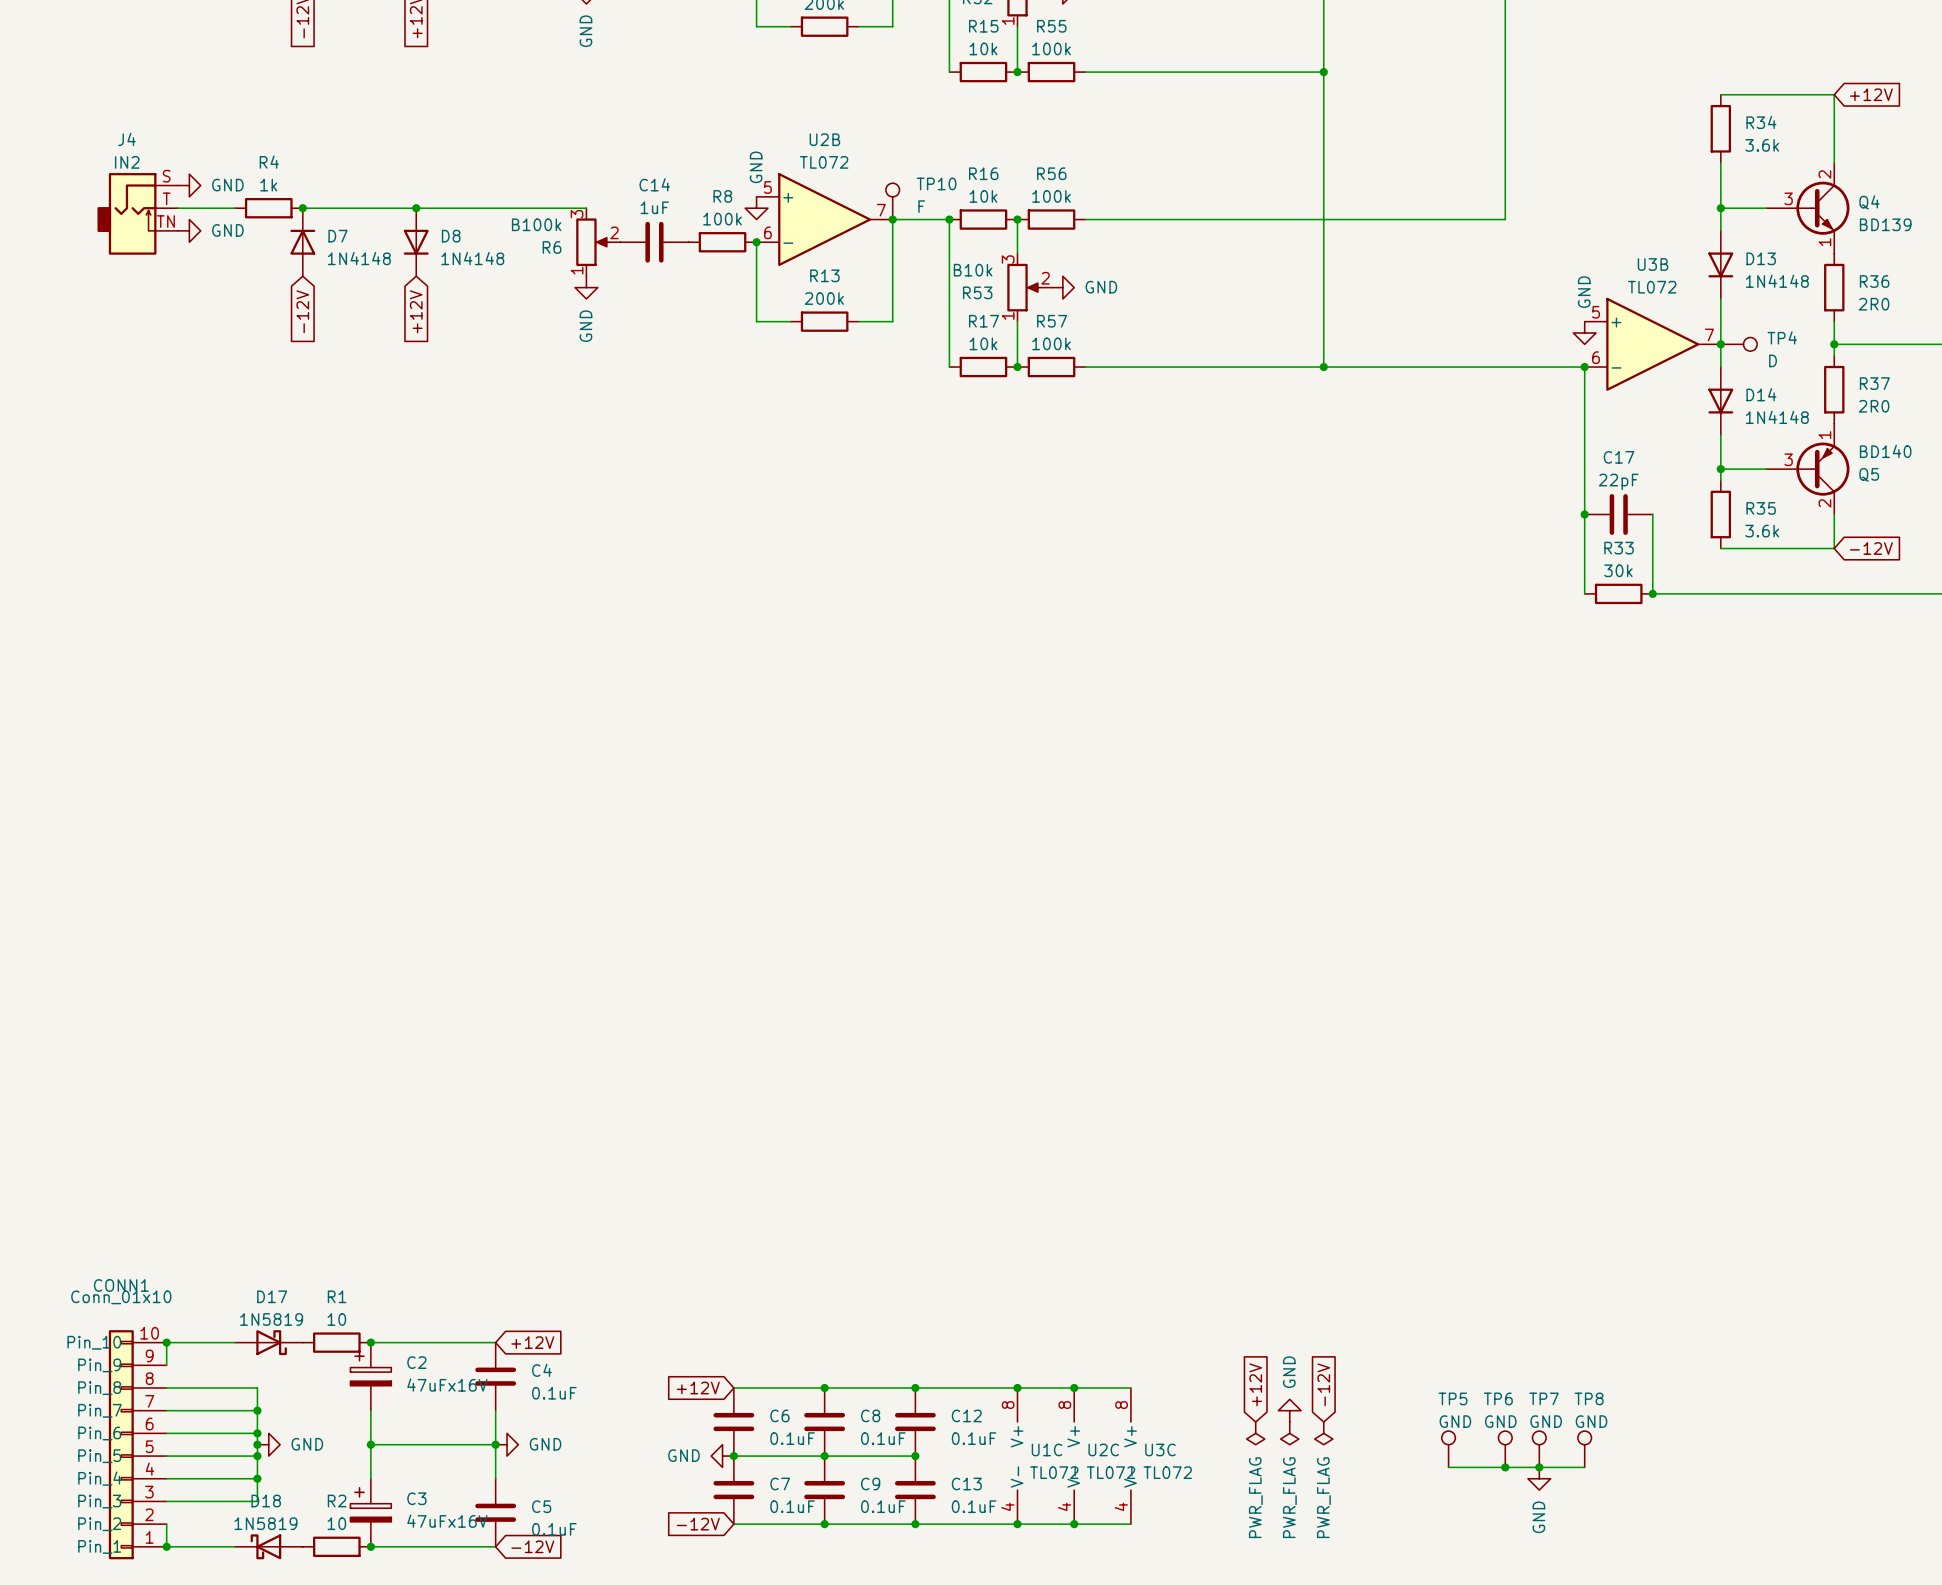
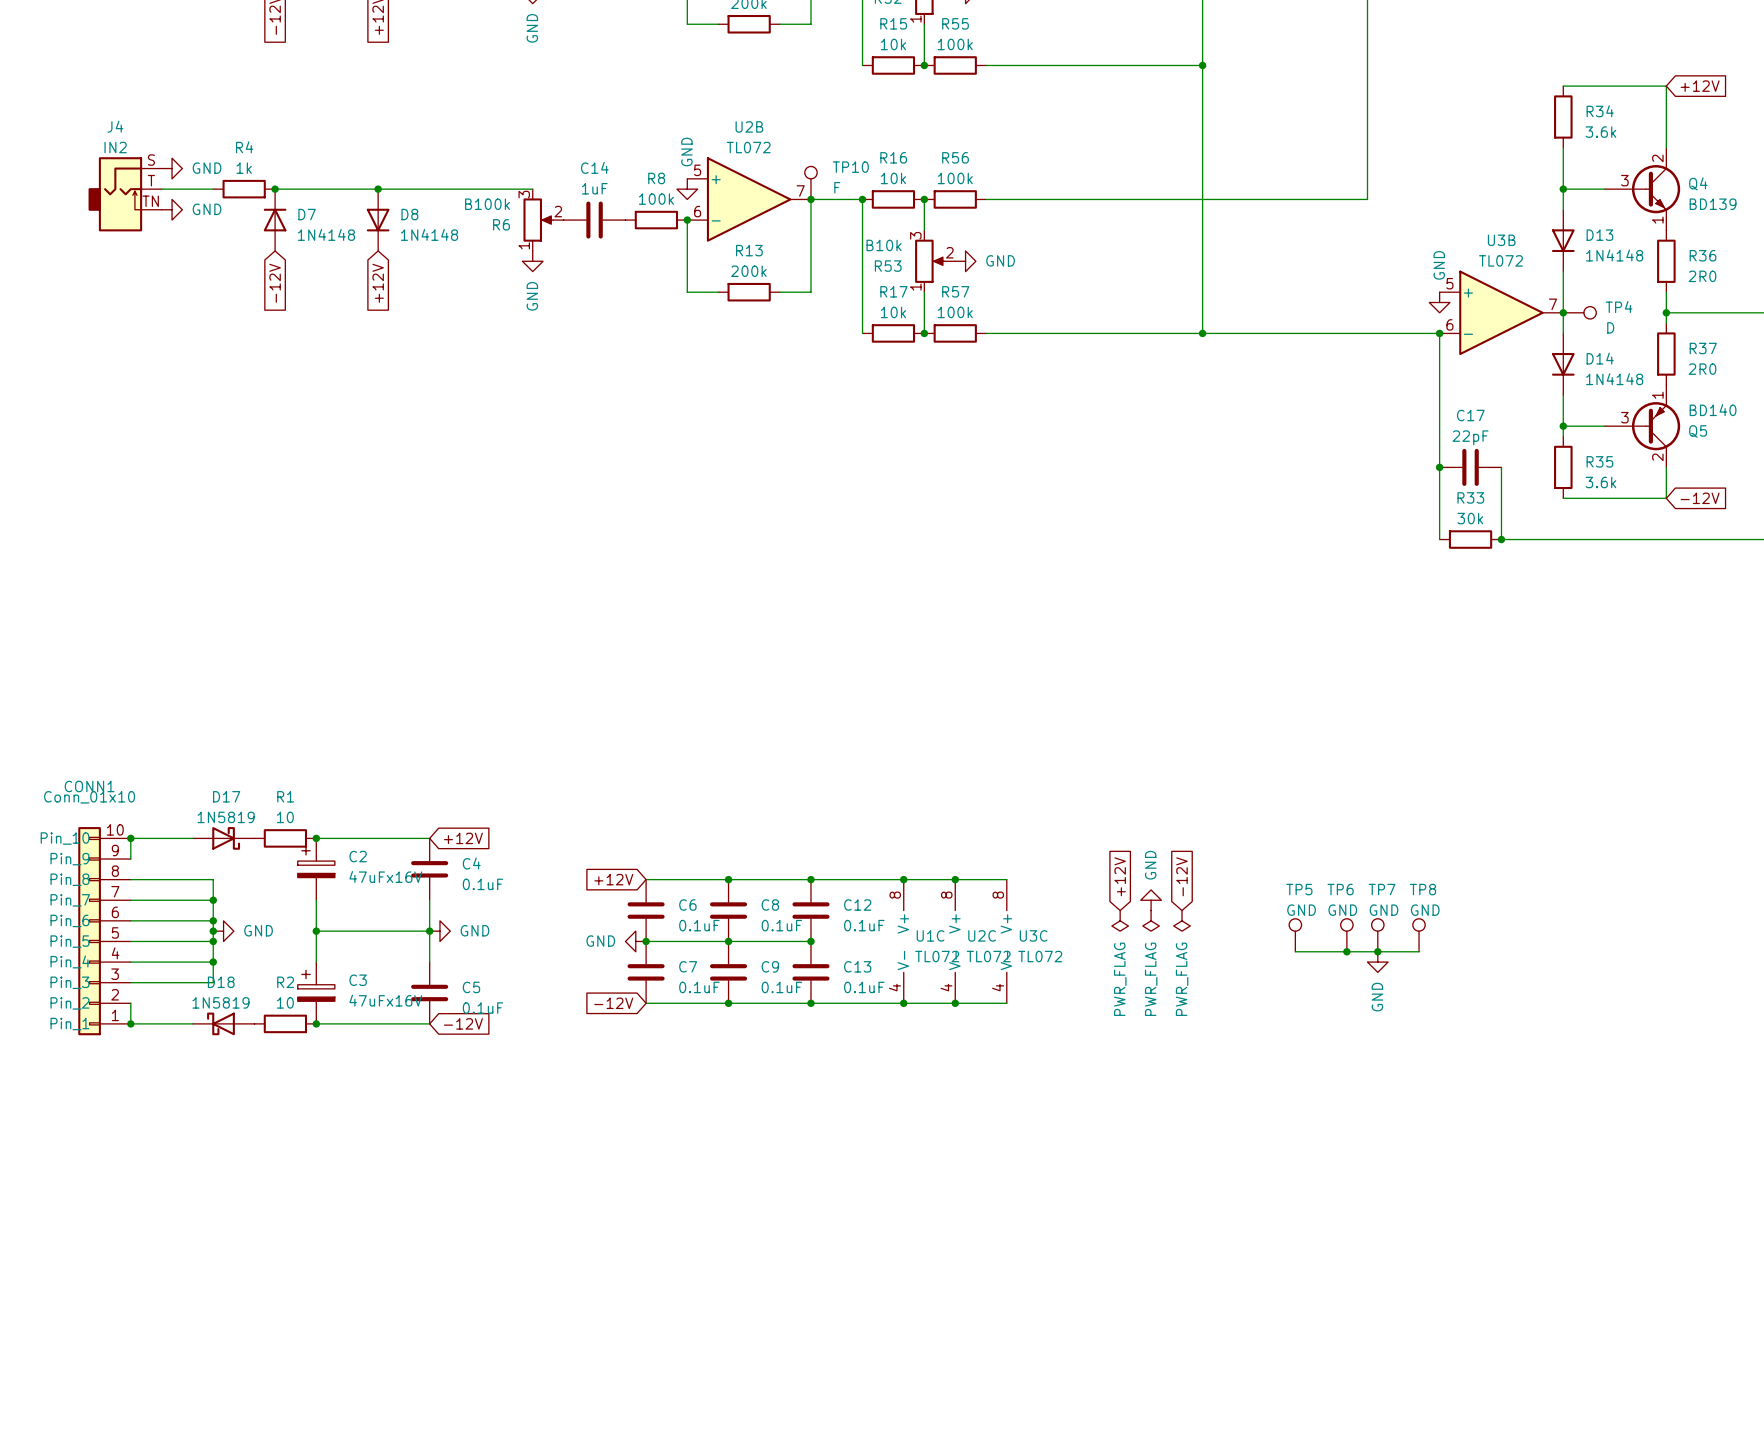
junction: none -> (130, 838)
wire: none -> (192, 838) (130, 838) (130, 859)
wire: none -> (316, 838) (429, 838)
junction: none -> (316, 838)
global label: none -> +12V (463, 838)
global label: none -> +12V (1120, 876)
global label: none -> -12V (1181, 876)
wire: none -> (130, 879) (213, 879) (213, 982) (130, 982)
global label: none -> +12V (613, 879)
wire: none -> (646, 879) (1006, 879)
junction: none -> (728, 879)
junction: none -> (810, 879)
junction: none -> (903, 879)
junction: none -> (955, 879)
wire: none -> (130, 900) (213, 900)
junction: none -> (213, 900)
wire: none -> (316, 900) (316, 962)
wire: none -> (429, 900) (429, 962)
power symbol: none -> GND (1151, 900)
wire: none -> (130, 920) (213, 920)
junction: none -> (213, 920)
power symbol: none -> PWR_FLAG (1120, 920)
power symbol: none -> PWR_FLAG (1151, 920)
power symbol: none -> PWR_FLAG (1181, 920)
junction: none -> (213, 931)
power symbol: none -> GND (223, 931)
wire: none -> (316, 931) (429, 931)
junction: none -> (316, 931)
junction: none -> (429, 931)
power symbol: none -> GND (439, 931)
wire: none -> (130, 941) (213, 941)
junction: none -> (213, 941)
power symbol: none -> GND (635, 941)
wire: none -> (646, 941) (810, 941)
junction: none -> (646, 941)
junction: none -> (728, 941)
junction: none -> (810, 941)
wire: none -> (1295, 951) (1419, 951)
junction: none -> (1346, 951)
junction: none -> (1377, 951)
wire: none -> (130, 962) (213, 962)
junction: none -> (213, 962)
power symbol: none -> GND (1377, 962)
wire: none -> (130, 1003) (130, 1023) (192, 1023)
global label: none -> -12V (613, 1003)
wire: none -> (646, 1003) (1006, 1003)
junction: none -> (728, 1003)
junction: none -> (810, 1003)
junction: none -> (903, 1003)
junction: none -> (955, 1003)
junction: none -> (130, 1023)
junction: none -> (316, 1023)
global label: none -> -12V (463, 1023)
junction: (166, 1342) -> none
wire: (234, 1342) (166, 1342) (166, 1365) -> none
D17 position: (268, 1342) -> (223, 838)
R1 position: (336, 1342) -> (285, 838)
wire: (370, 1342) (495, 1342) -> (316, 1023) (429, 1023)
junction: (370, 1342) -> none
global label: +12V (532, 1342) -> none
C2 position: (370, 1376) -> (316, 869)
C4 position: (495, 1376) -> (429, 869)
global label: +12V (1255, 1384) -> none
global label: -12V (1323, 1384) -> none
wire: (166, 1387) (257, 1387) (257, 1501) (166, 1501) -> none
global label: +12V (698, 1387) -> none
wire: (733, 1387) (1130, 1387) -> none
junction: (824, 1387) -> none
junction: (915, 1387) -> none
junction: (1017, 1387) -> none
junction: (1074, 1387) -> none
wire: (166, 1410) (257, 1410) -> none
junction: (257, 1410) -> none
wire: (370, 1410) (370, 1478) -> none
wire: (495, 1410) (495, 1478) -> none
power symbol: GND (1289, 1410) -> none
C6 position: (733, 1422) -> (646, 910)
C8 position: (824, 1422) -> (728, 910)
C12 position: (915, 1422) -> (810, 910)
wire: (166, 1433) (257, 1433) -> none
junction: (257, 1433) -> none
power symbol: PWR_FLAG (1255, 1433) -> none
power symbol: PWR_FLAG (1289, 1433) -> none
power symbol: PWR_FLAG (1323, 1433) -> none
CONN1 position: (137, 1444) -> (104, 931)
junction: (257, 1444) -> none
power symbol: GND (268, 1444) -> none
wire: (370, 1444) (495, 1444) -> none
junction: (370, 1444) -> none
junction: (495, 1444) -> none
power symbol: GND (507, 1444) -> none
TP5 position: (1448, 1449) -> (1295, 935)
TP6 position: (1505, 1449) -> (1346, 935)
TP7 position: (1539, 1449) -> (1377, 935)
TP8 position: (1584, 1449) -> (1419, 935)
wire: (166, 1456) (257, 1456) -> none
junction: (257, 1456) -> none
power symbol: GND (722, 1456) -> none
wire: (733, 1456) (915, 1456) -> none
junction: (733, 1456) -> none
junction: (824, 1456) -> none
junction: (915, 1456) -> none
U1C position: (1017, 1456) -> (903, 941)
U2C position: (1074, 1456) -> (955, 941)
U3C position: (1130, 1456) -> (1006, 941)
wire: (1448, 1467) (1584, 1467) -> none
junction: (1505, 1467) -> none
junction: (1539, 1467) -> none
wire: (166, 1478) (257, 1478) -> none
junction: (257, 1478) -> none
power symbol: GND (1539, 1478) -> none
C7 position: (733, 1490) -> (646, 972)
C9 position: (824, 1490) -> (728, 972)
C13 position: (915, 1490) -> (810, 972)
C3 position: (370, 1512) -> (316, 992)
C5 position: (495, 1512) -> (429, 992)
wire: (166, 1524) (166, 1546) (234, 1546) -> none
global label: -12V (698, 1524) -> none
wire: (733, 1524) (1130, 1524) -> none
junction: (824, 1524) -> none
junction: (915, 1524) -> none
junction: (1017, 1524) -> none
junction: (1074, 1524) -> none
junction: (166, 1546) -> none
D18 position: (268, 1546) -> (223, 1023)
R2 position: (336, 1546) -> (285, 1023)
wire: (370, 1546) (495, 1546) -> none
junction: (370, 1546) -> none
global label: -12V (532, 1546) -> none

